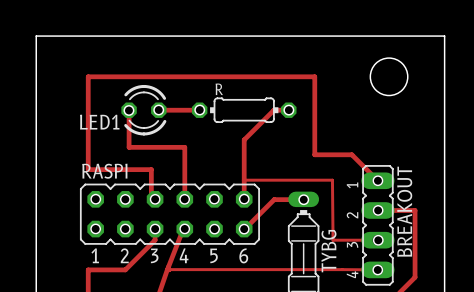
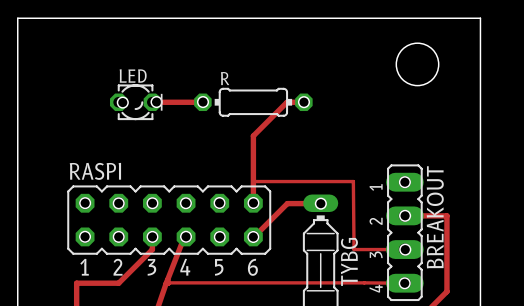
top track: (129, 110) (129, 147) (184, 147) (184, 199) -> none
LED: none -> (136, 102)
LED1: (143, 110) -> none
top track: (377, 180) (351, 154) (314, 154) (314, 76) (88, 76) (88, 169) (151, 169) (151, 199) (155, 199) -> none

